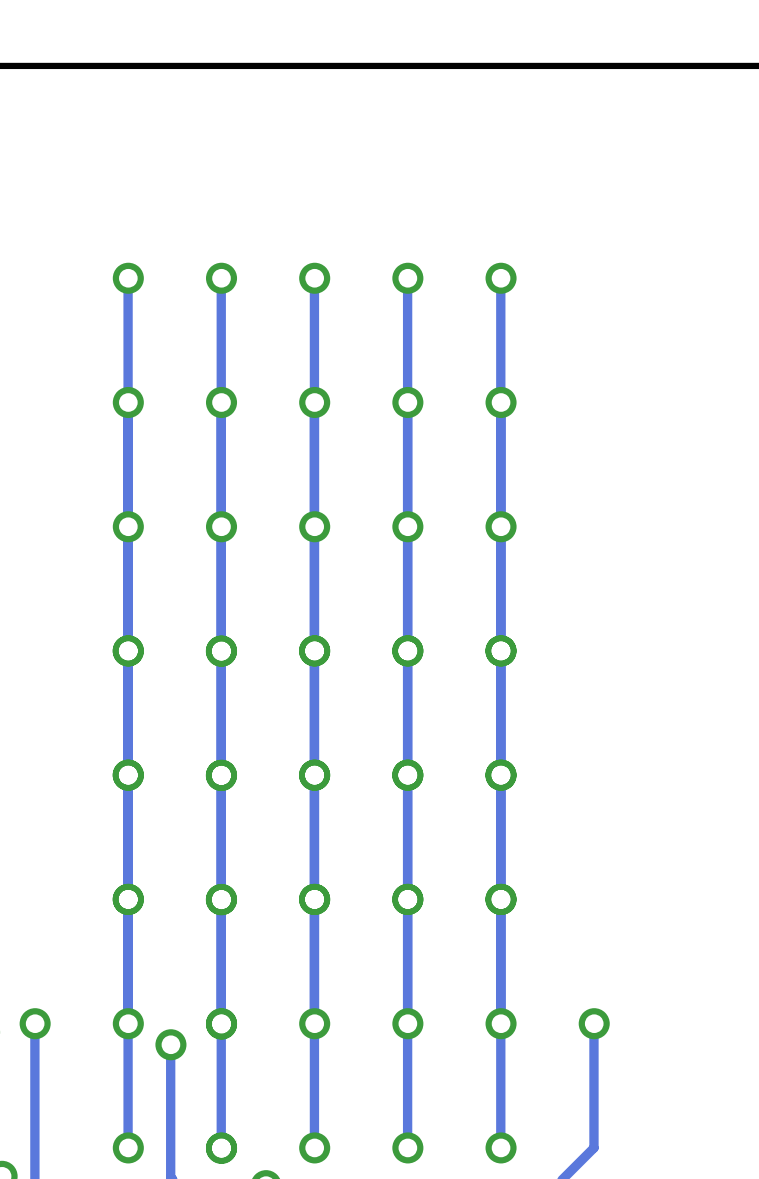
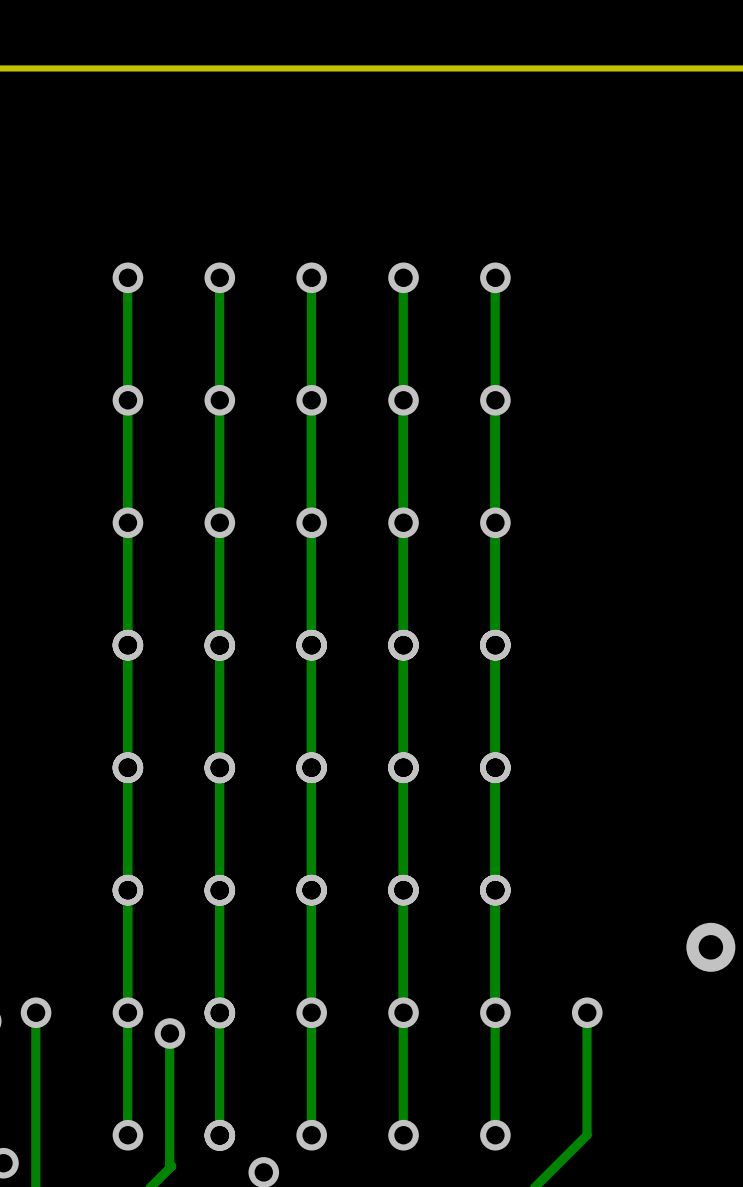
via: none -> (710, 947)

